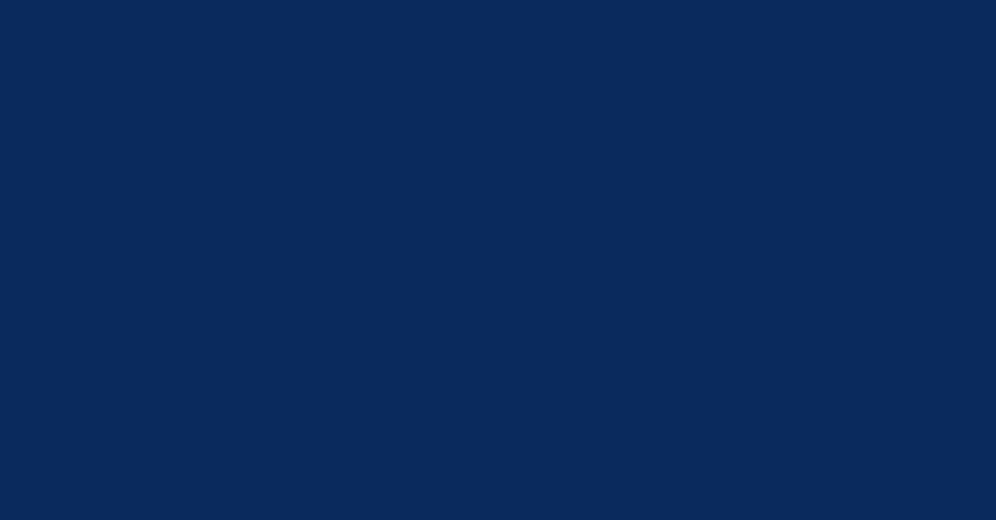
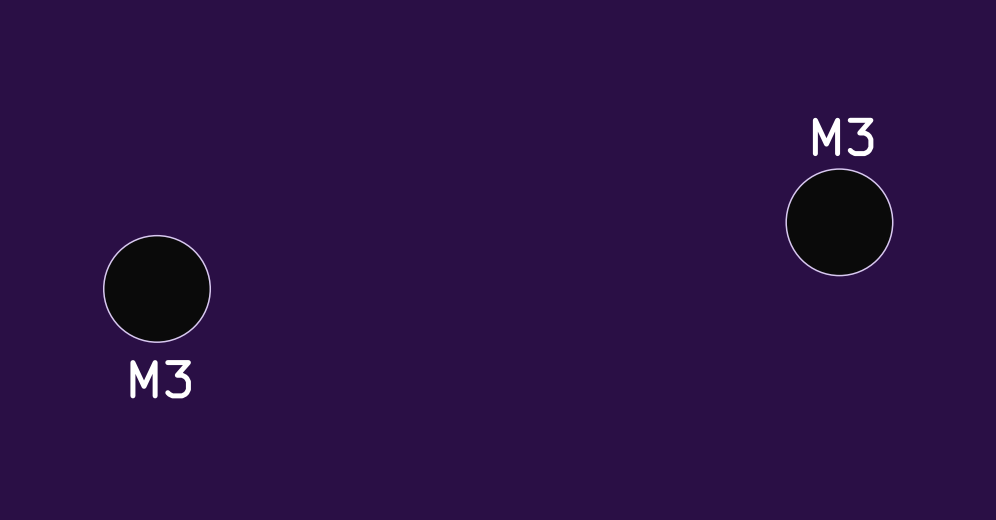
M3: none -> (839, 222)
M3: none -> (157, 288)

